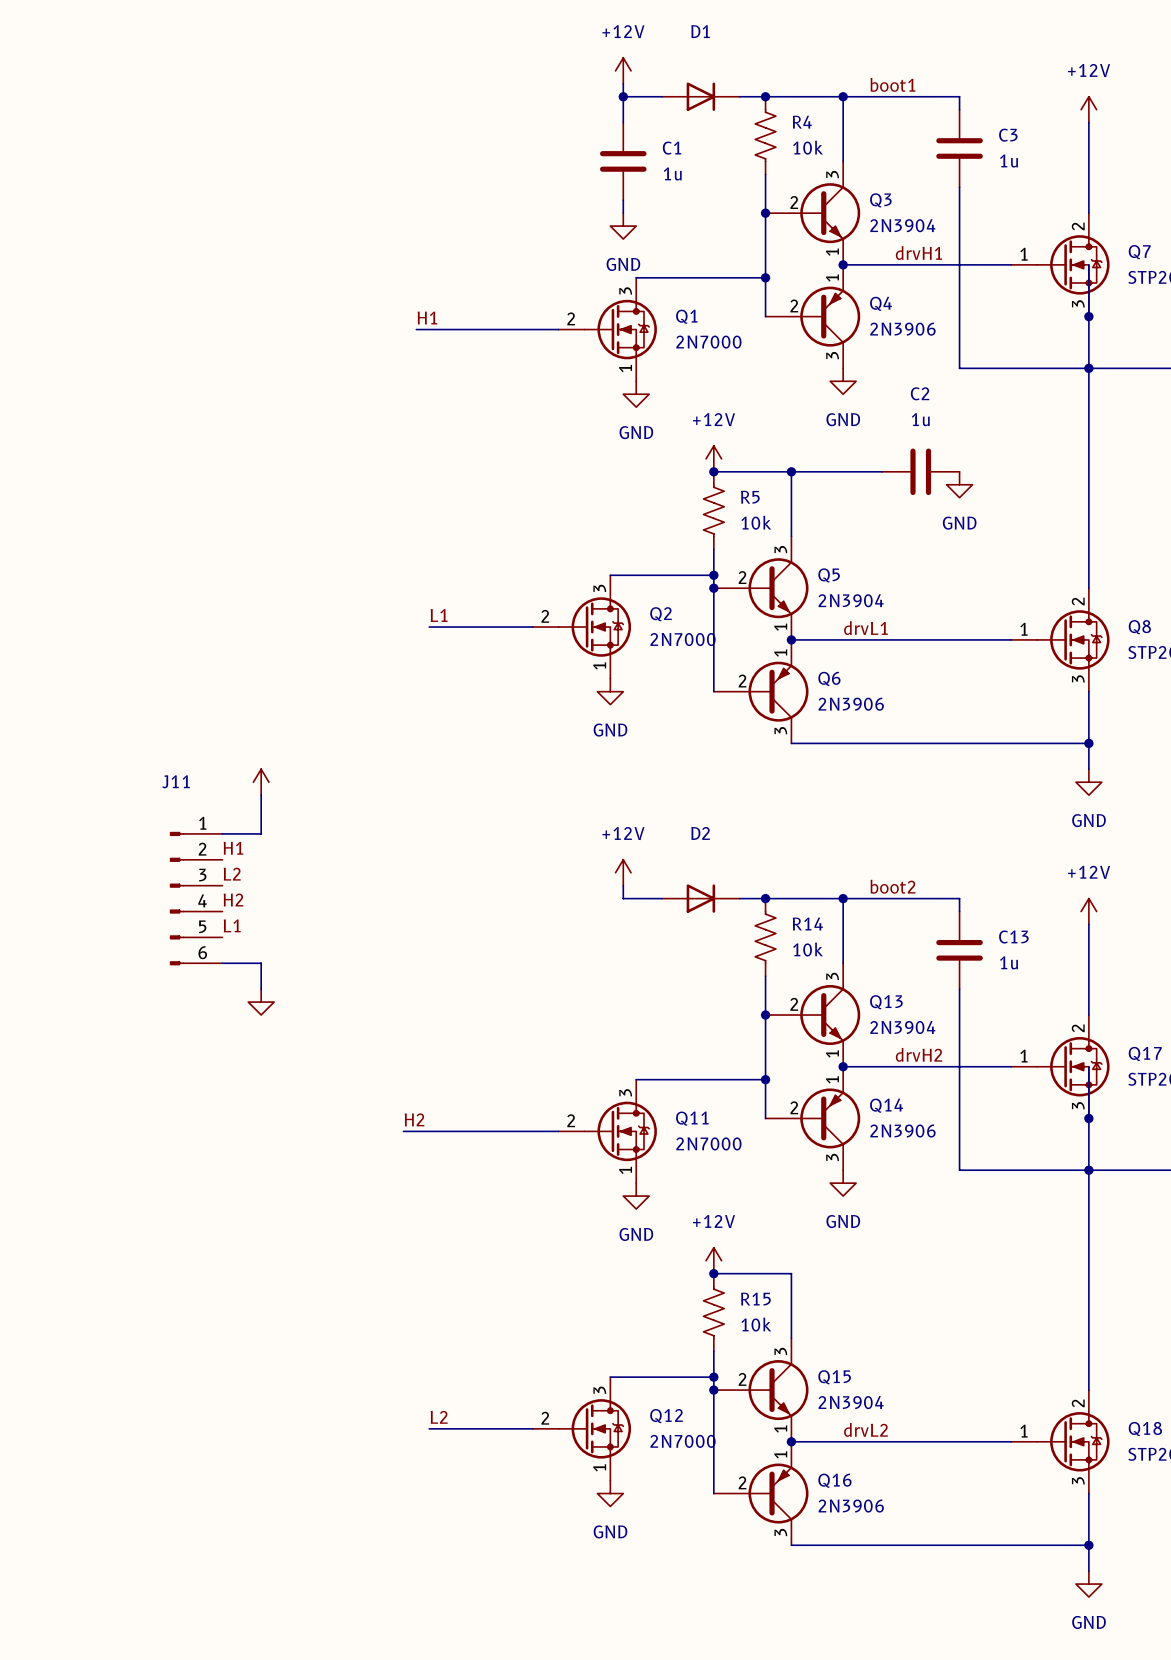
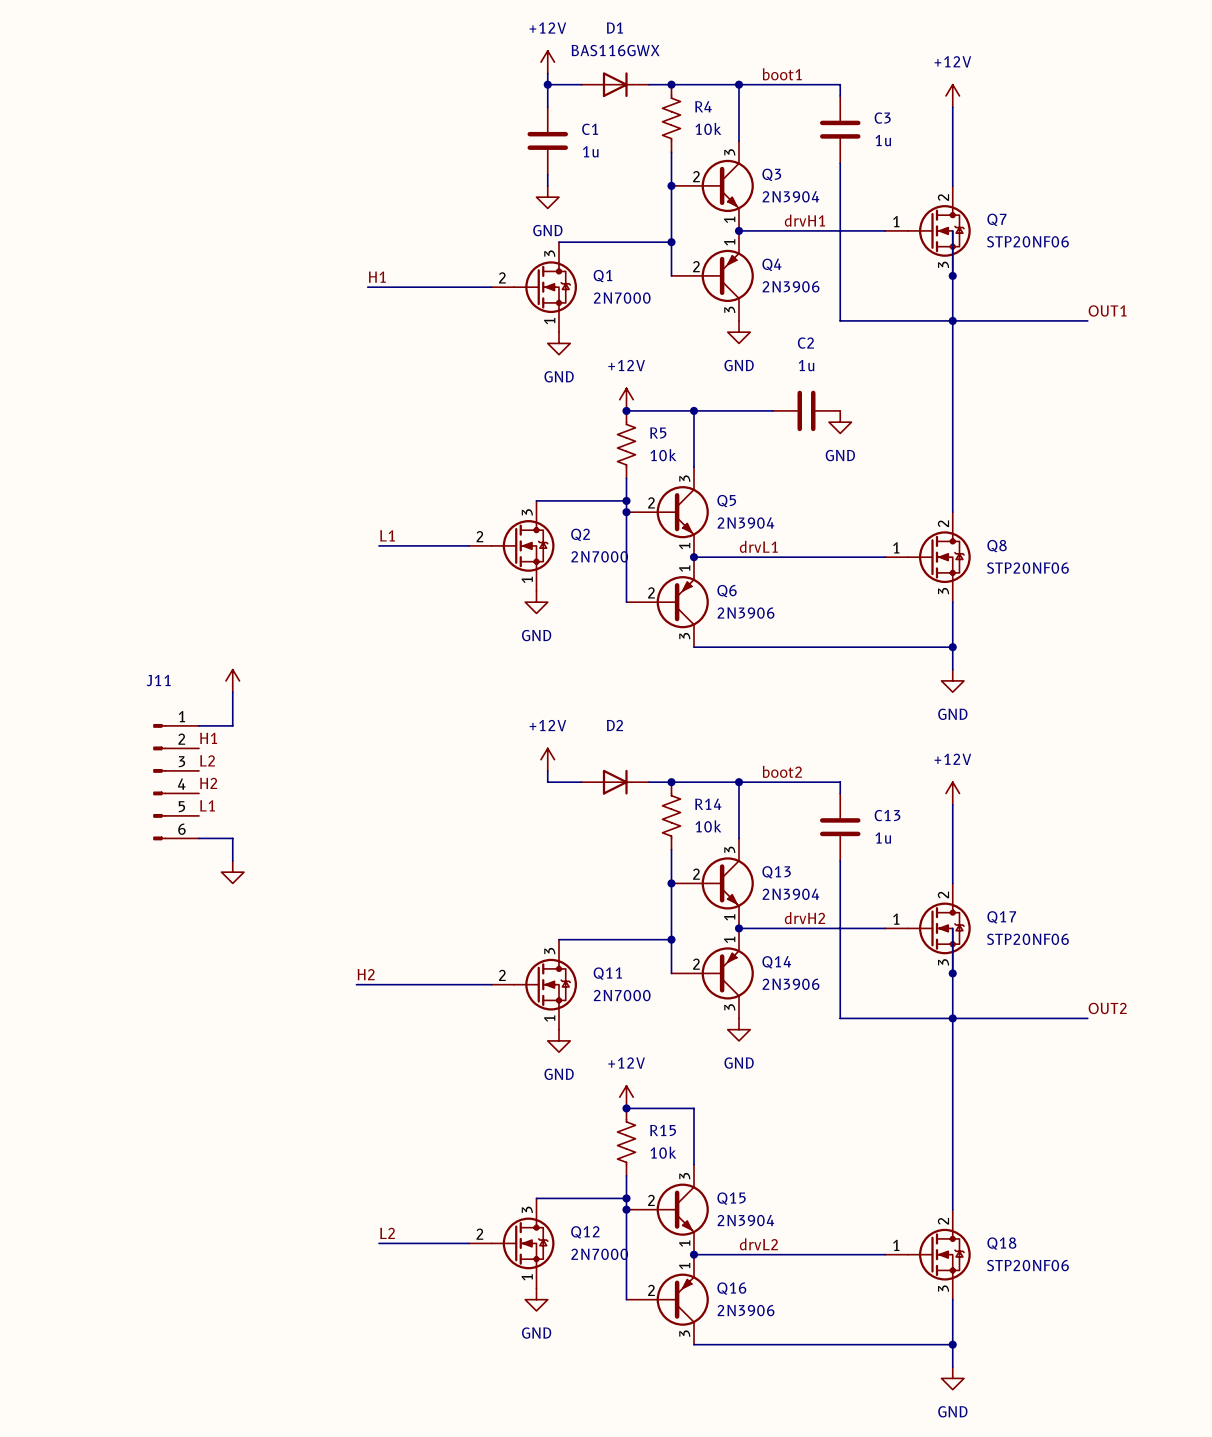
D1 value: none -> BAS116GWX (615, 50)

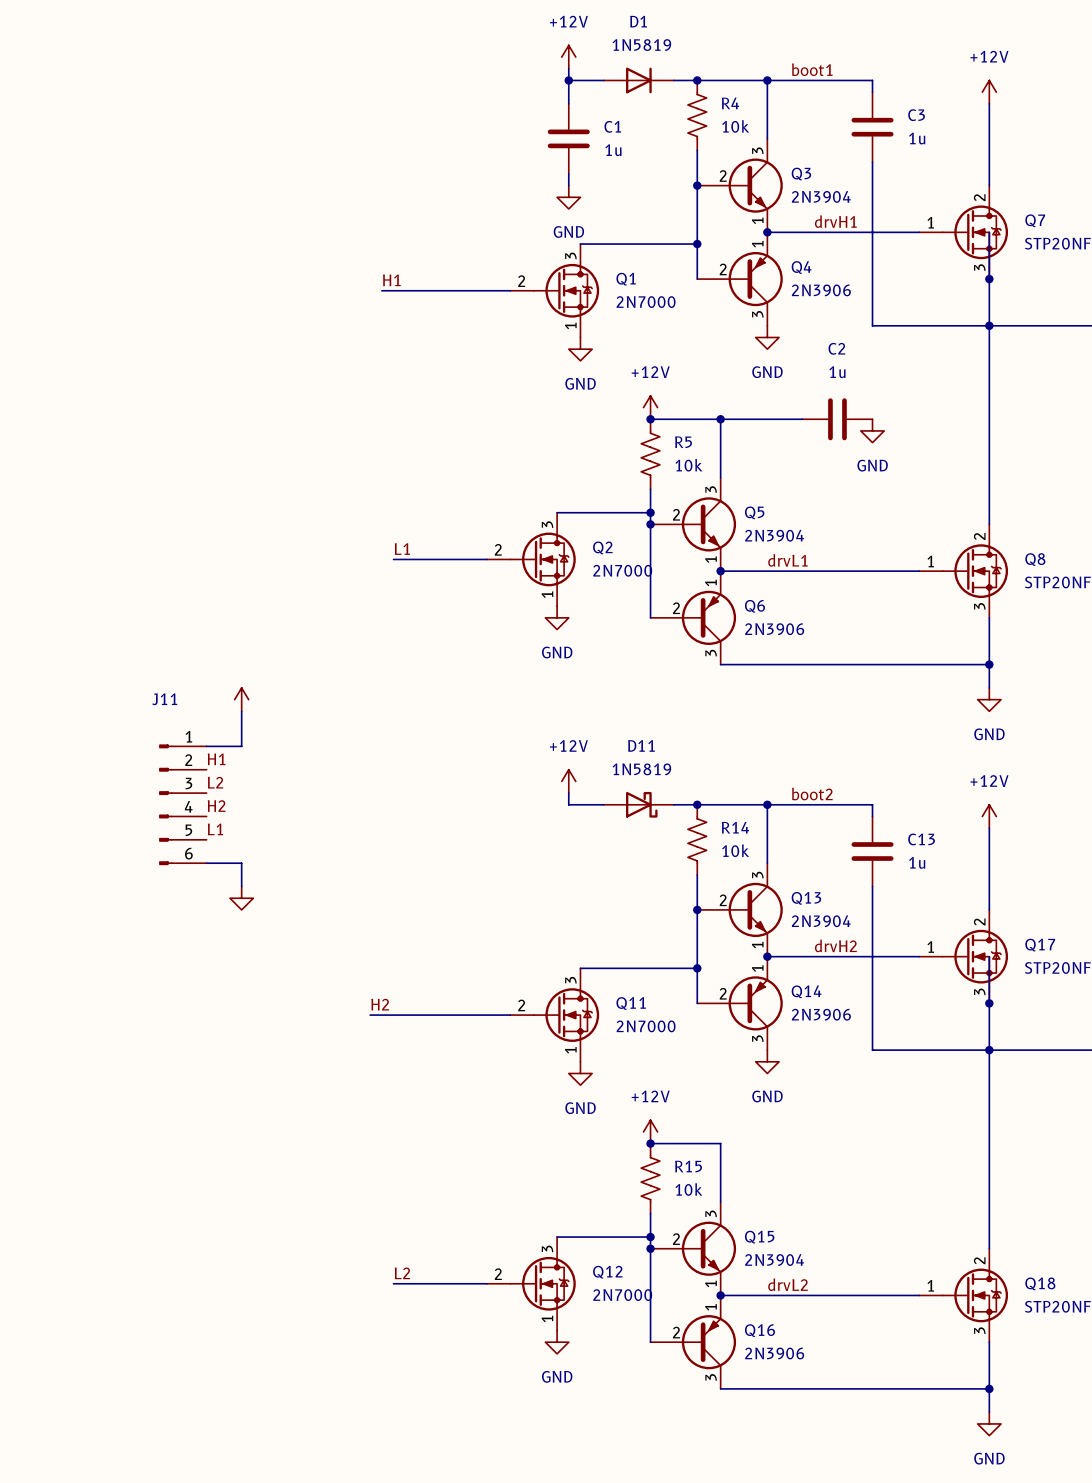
D1 value: BAS116GWX (615, 50) -> 1N5819 (641, 45)
D2: (615, 782) -> none
D11: none -> 1N5819 (638, 804)

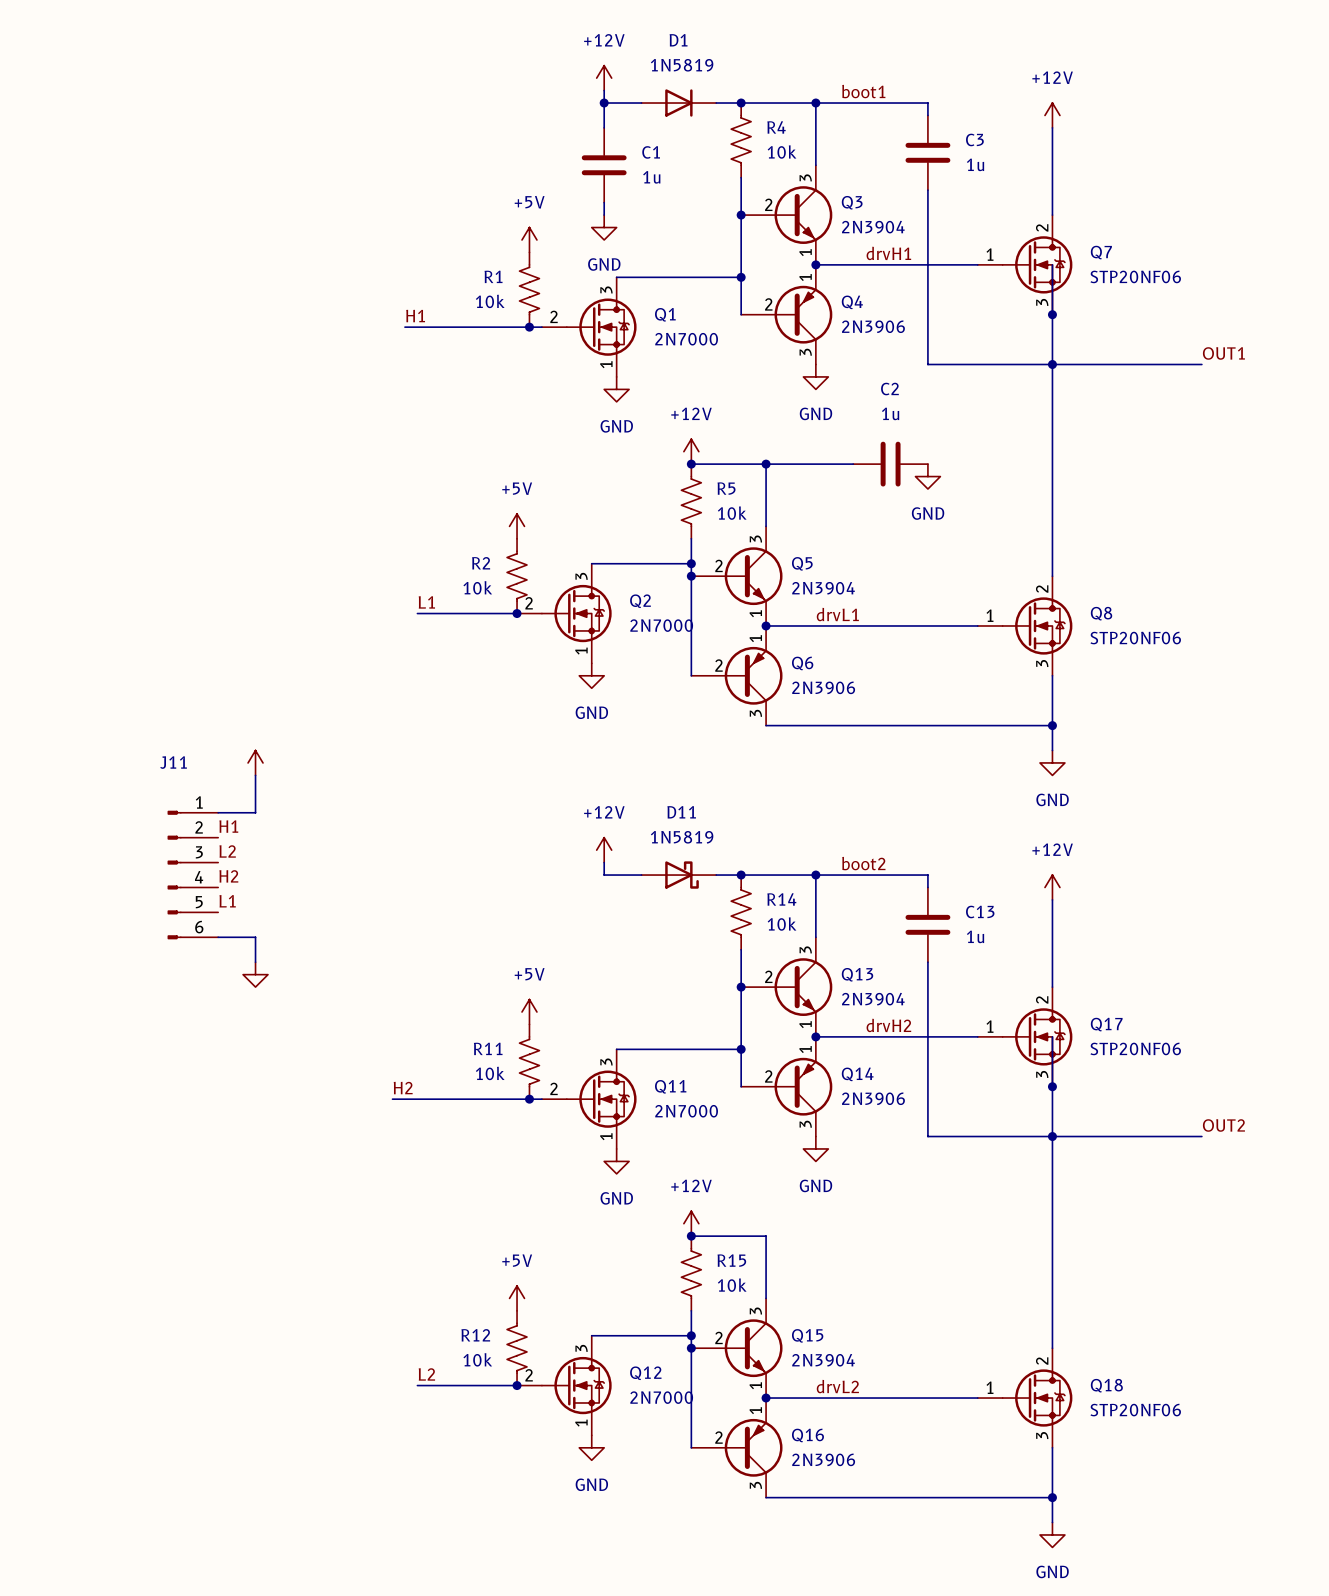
power symbol: none -> +5V (529, 239)
R1: none -> 10k (529, 289)
junction: none -> (529, 327)
power symbol: none -> +5V (517, 526)
R2: none -> 10k (517, 576)
junction: none -> (517, 613)
power symbol: none -> +5V (529, 1012)
R11: none -> 10k (529, 1061)
junction: none -> (529, 1099)
power symbol: none -> +5V (517, 1298)
R12: none -> 10k (517, 1348)
junction: none -> (517, 1385)

